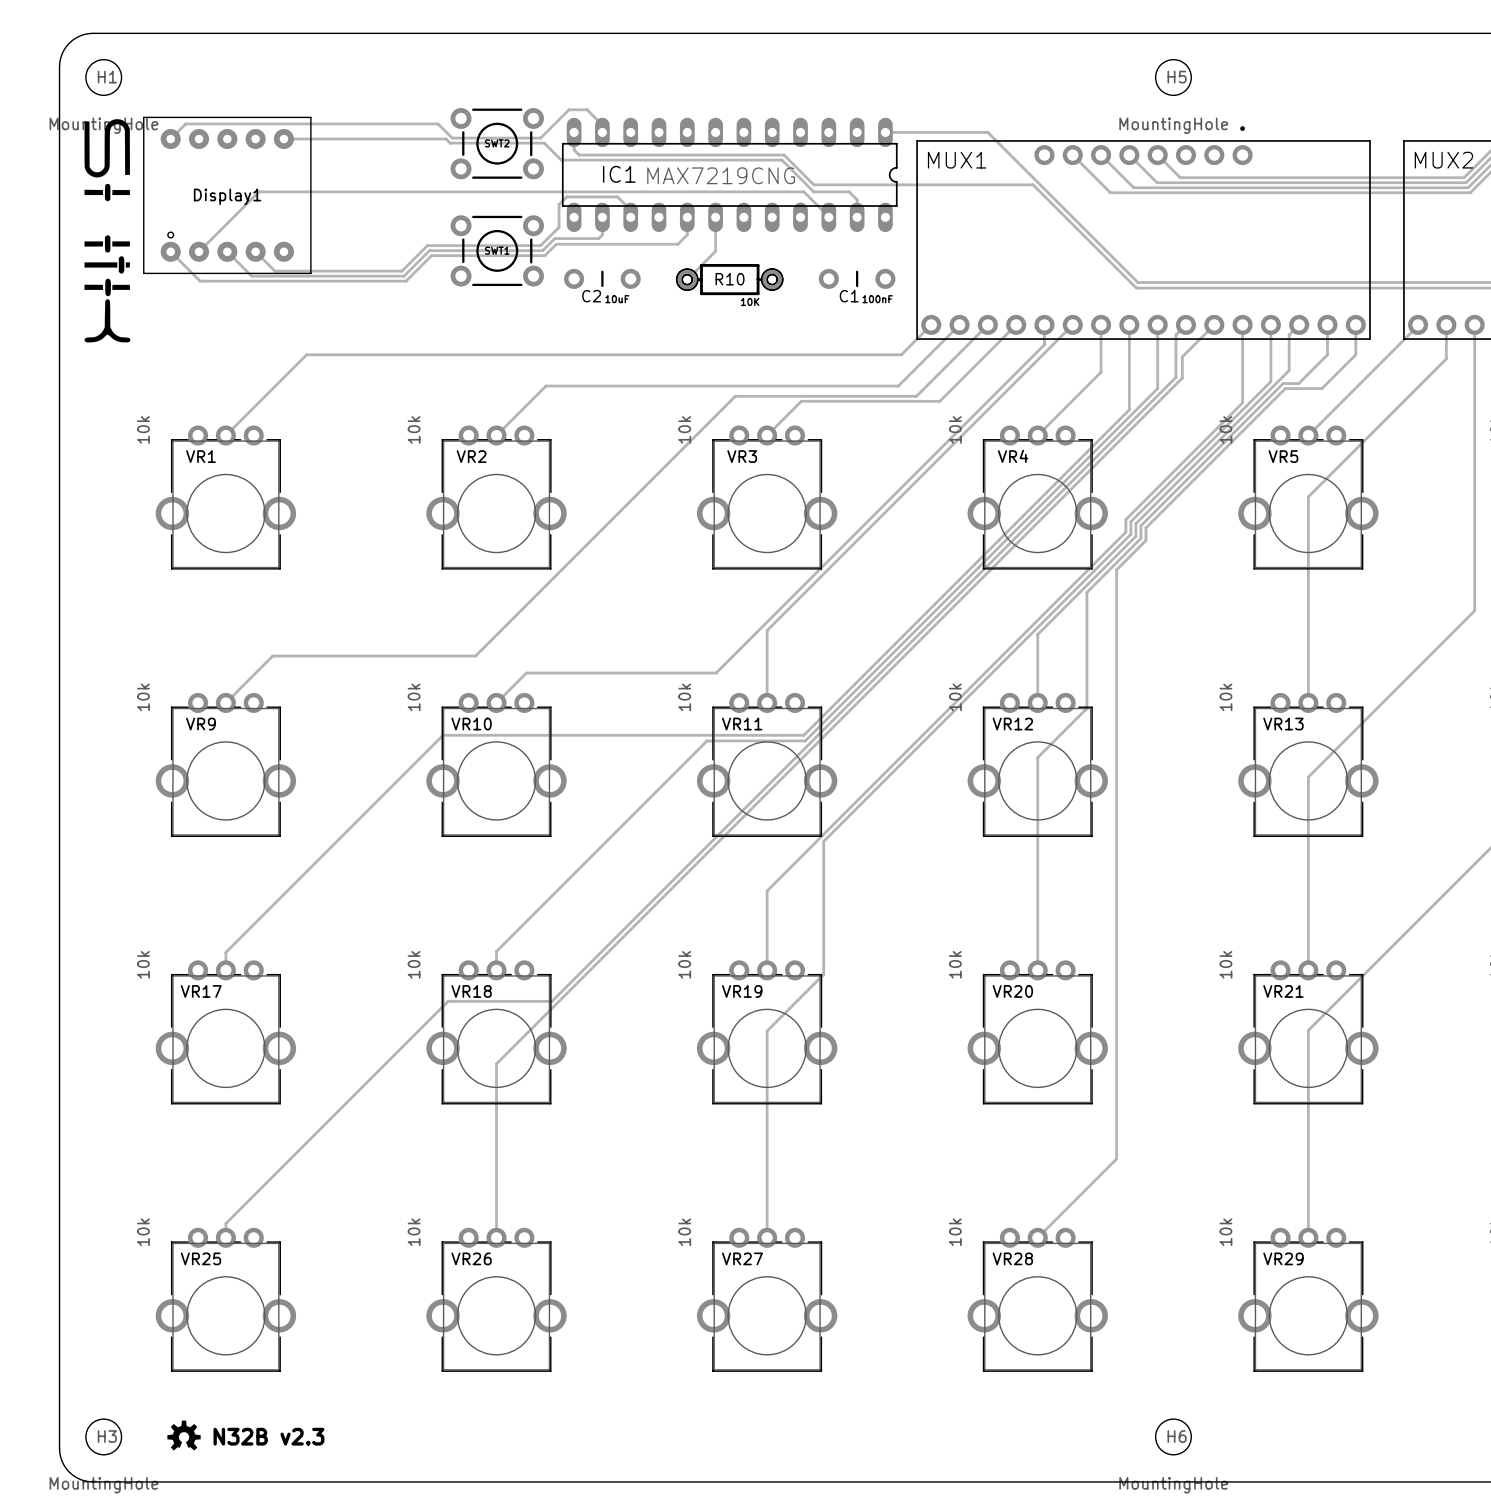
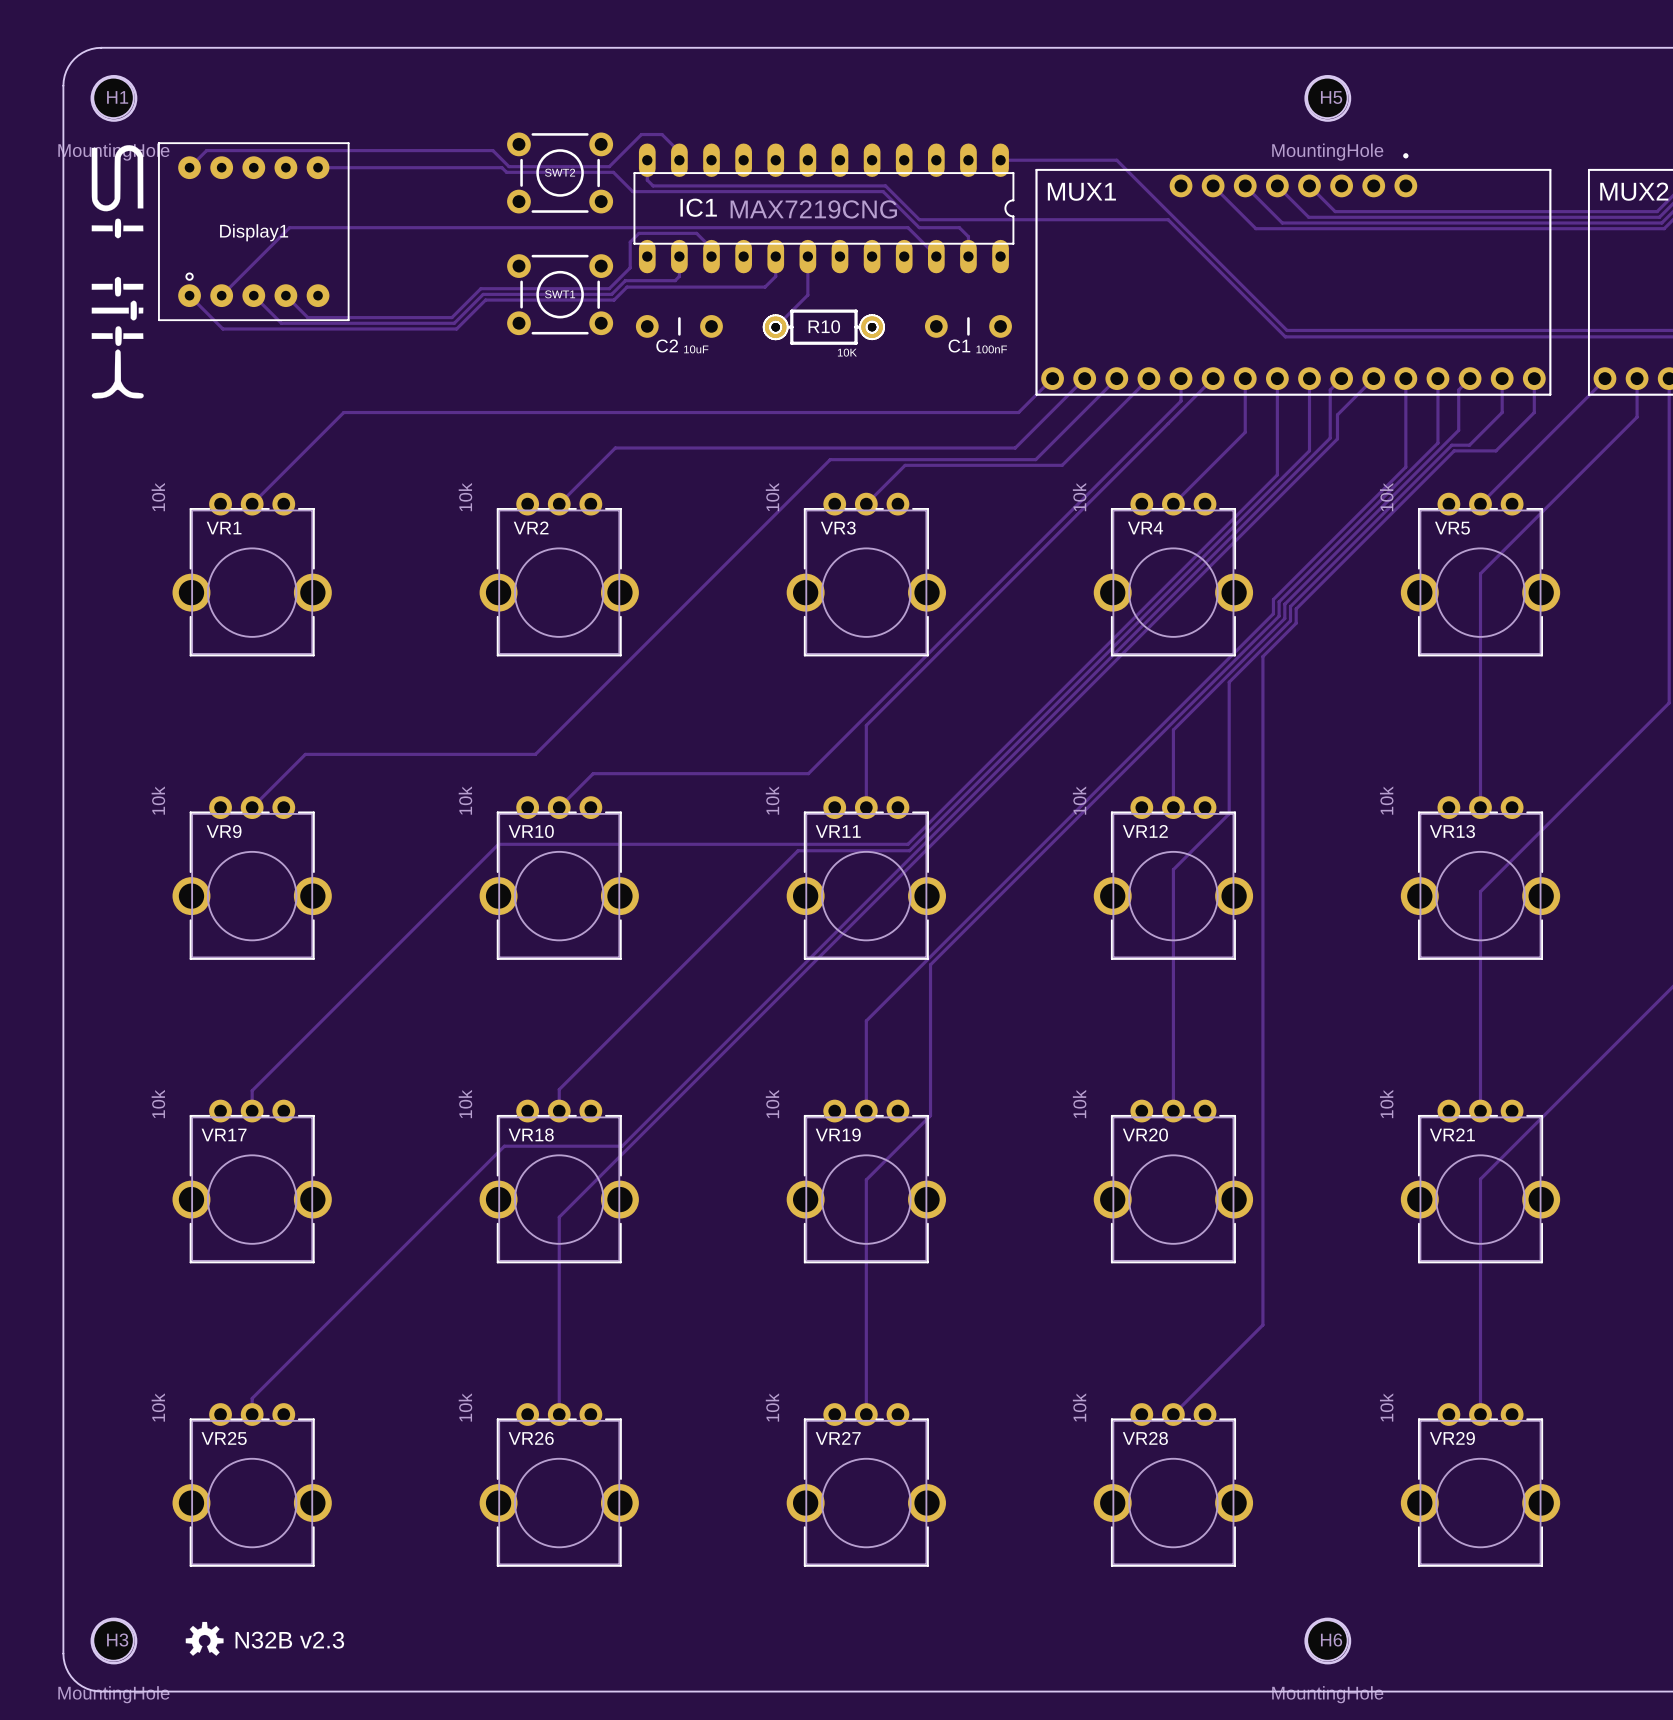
round board edge: none -> [90, 75, 138, 122]
round board edge: none -> [1304, 75, 1352, 122]
round board edge: none -> [90, 1617, 138, 1665]
round board edge: none -> [1304, 1617, 1352, 1665]

